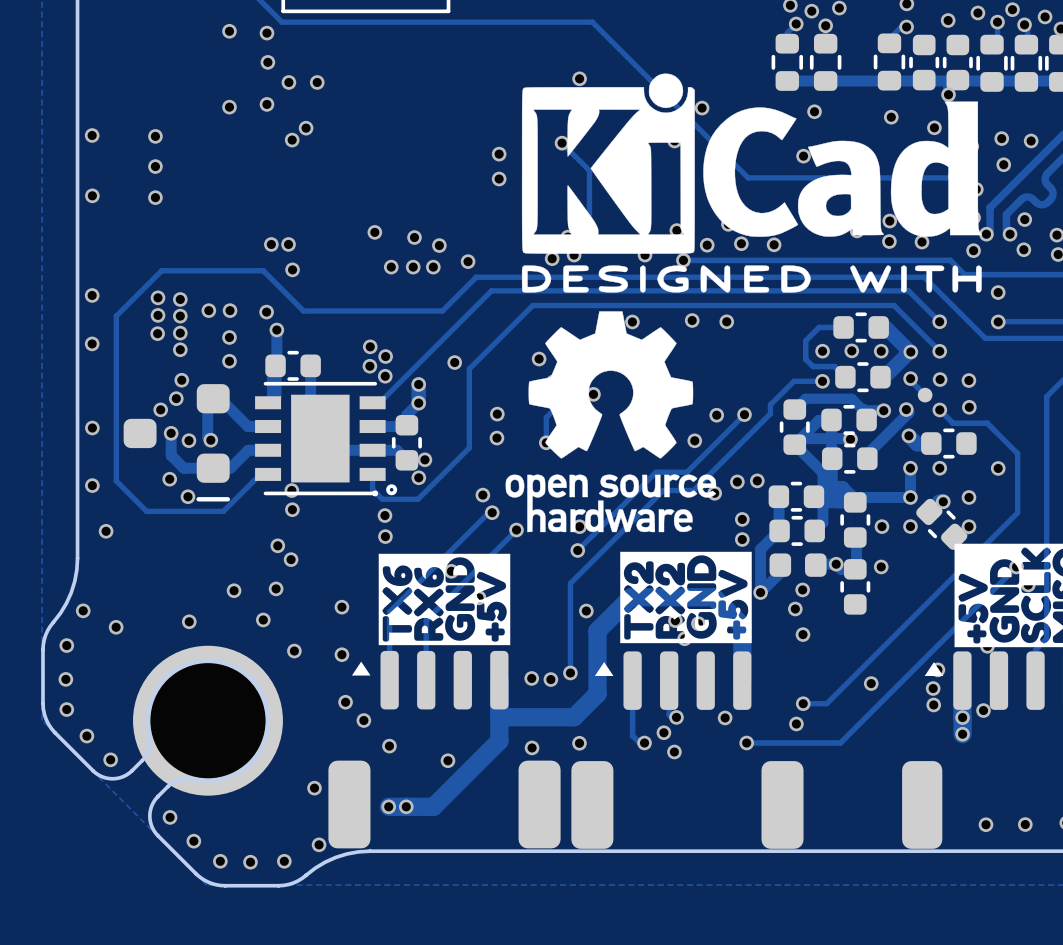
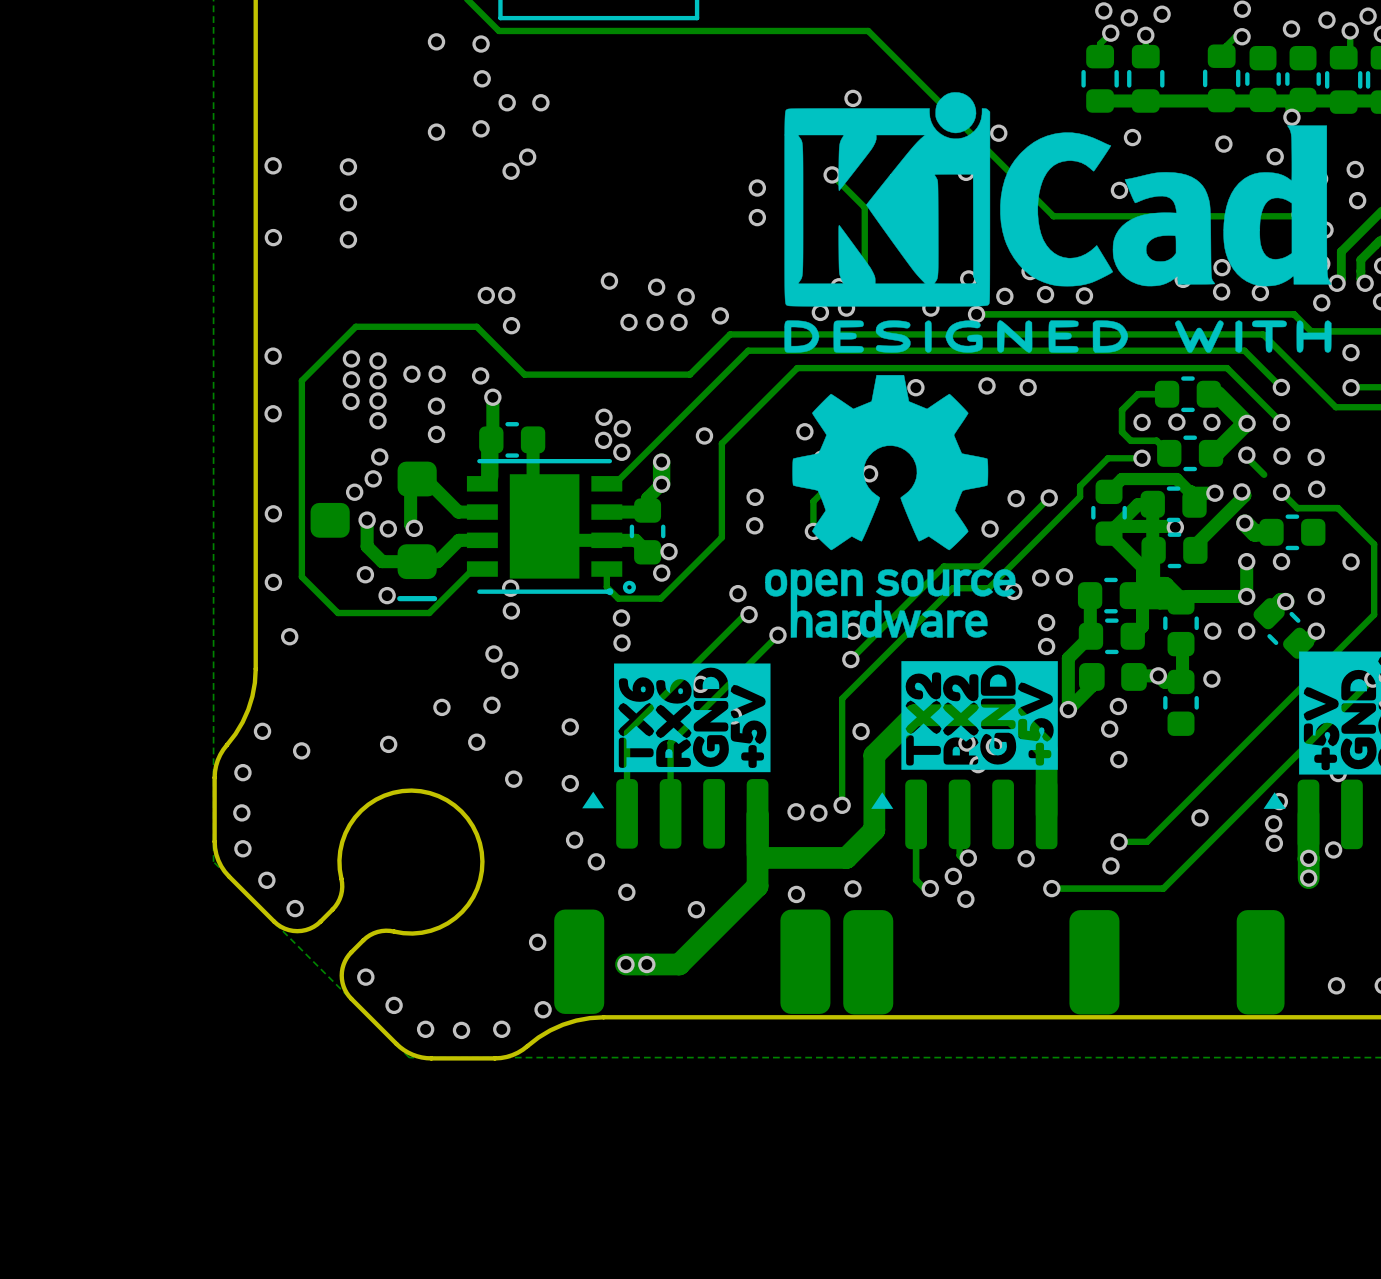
part: (925, 395) -> none
part: (207, 720) -> none

